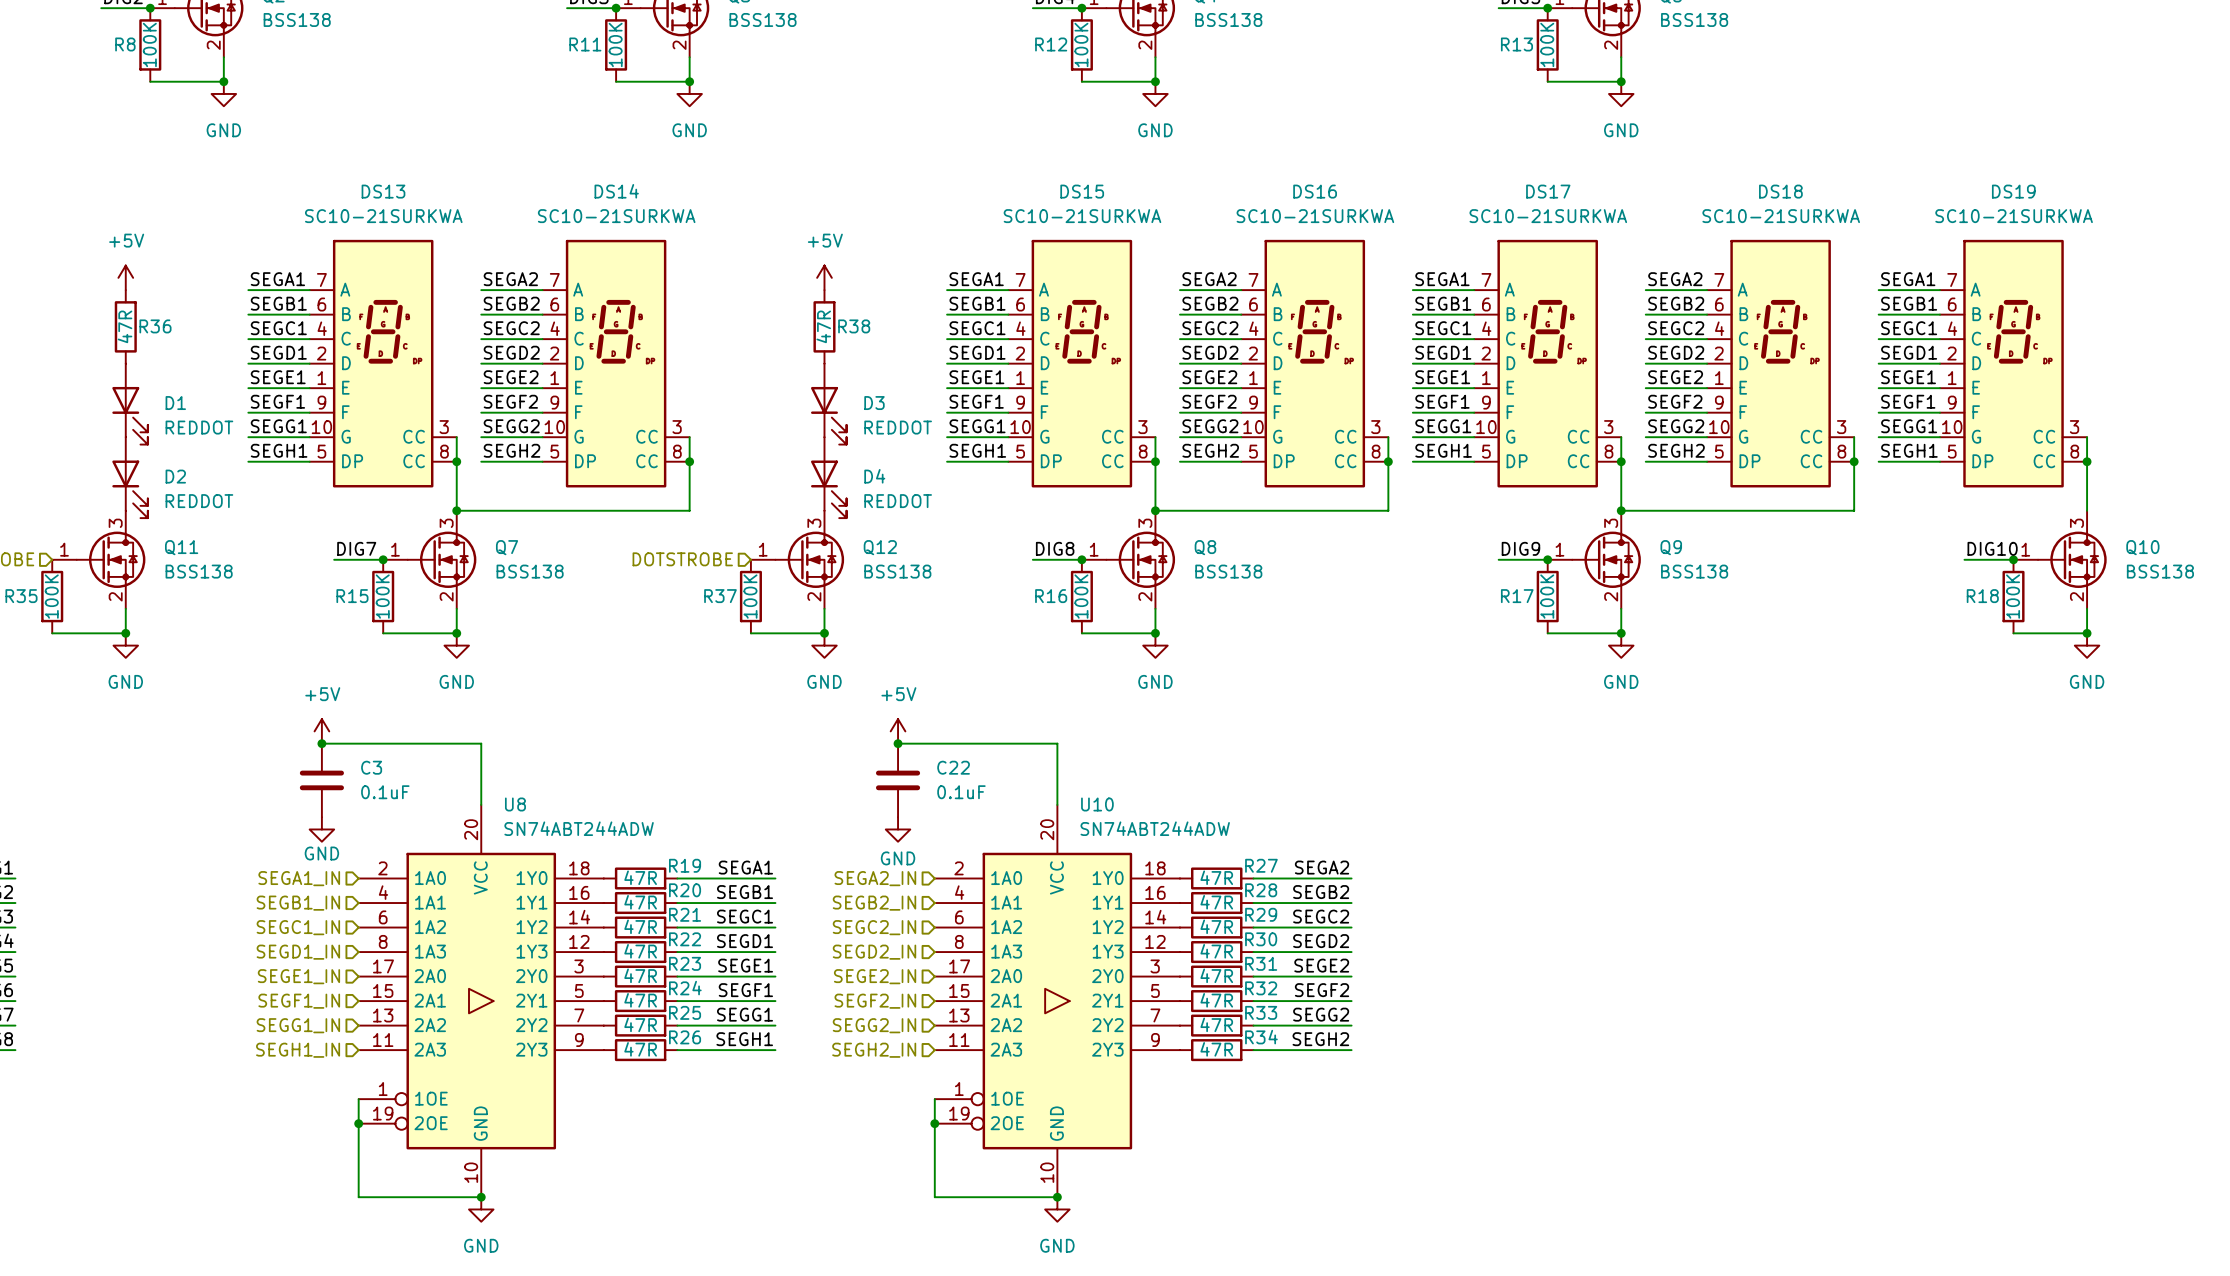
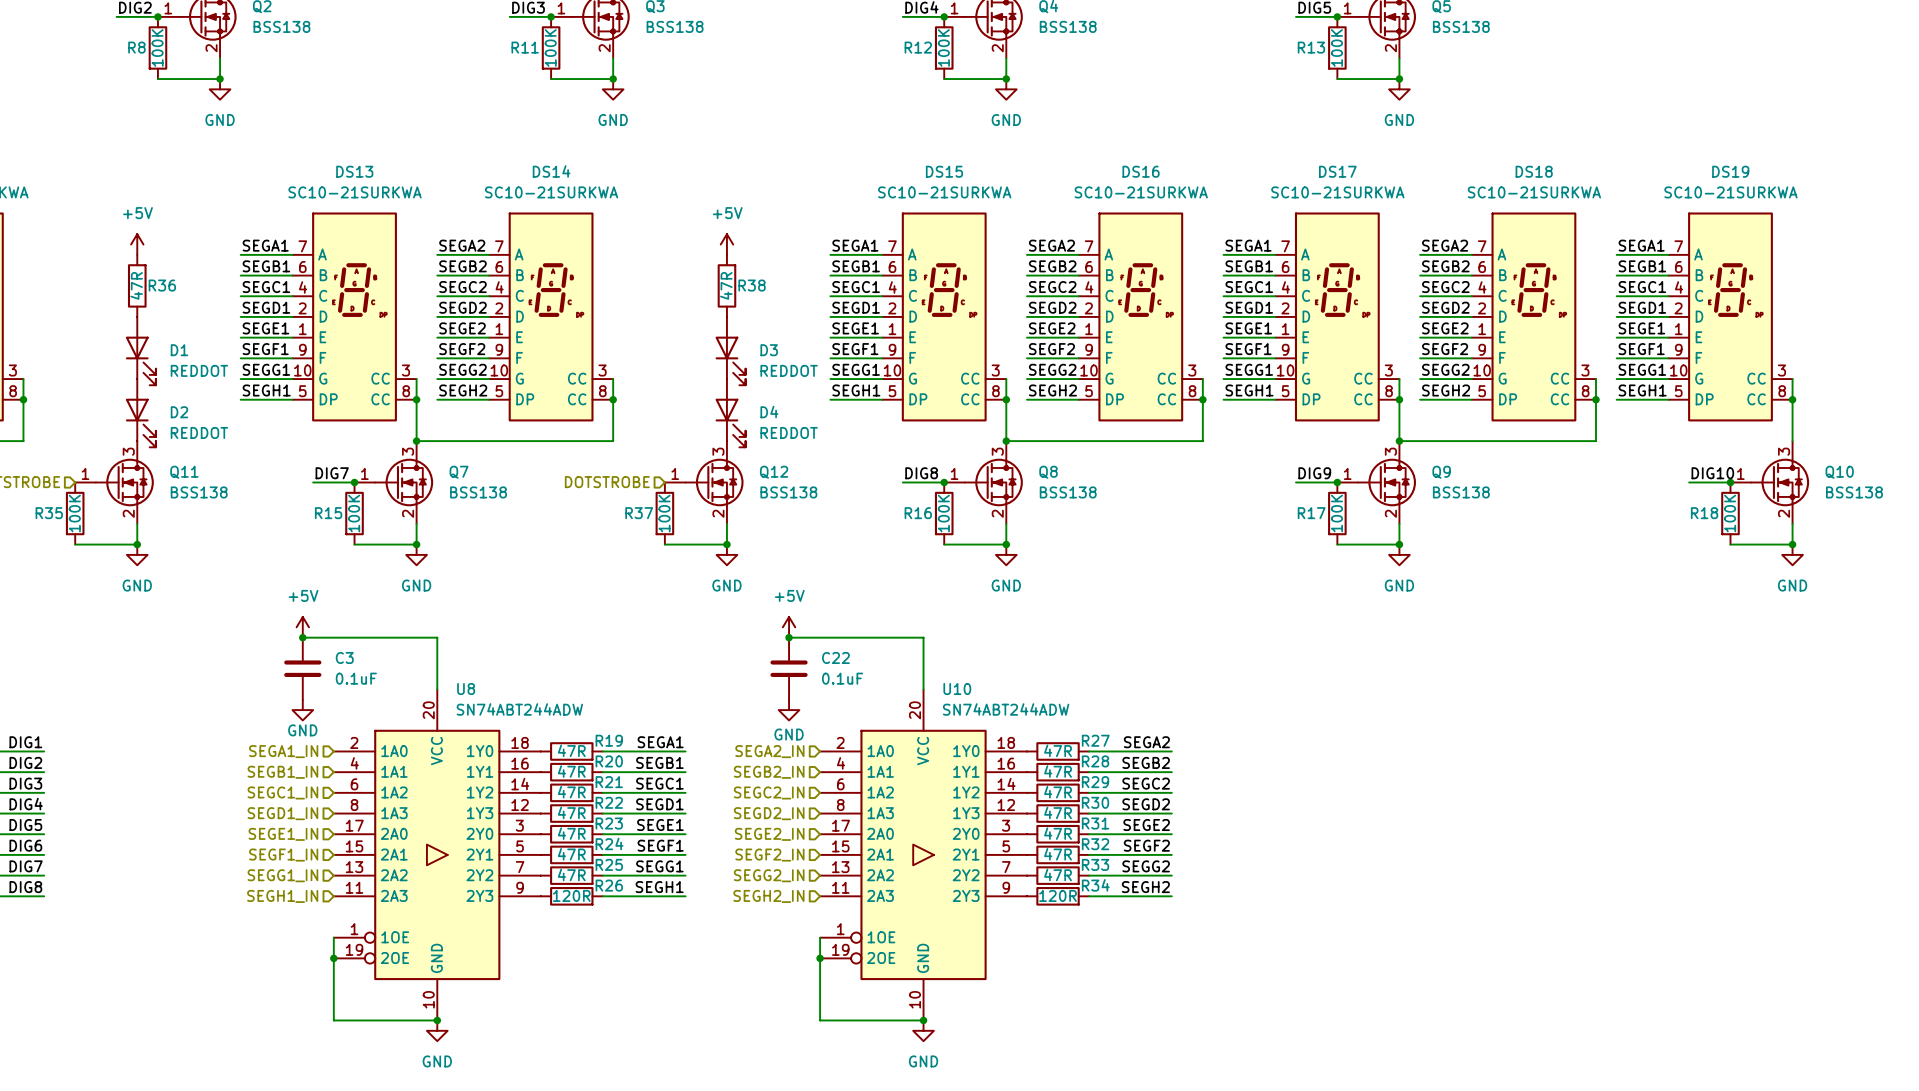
R26 value: 47R (640, 1049) -> 120R (571, 895)
R34 value: 47R (1216, 1049) -> 120R (1058, 895)

